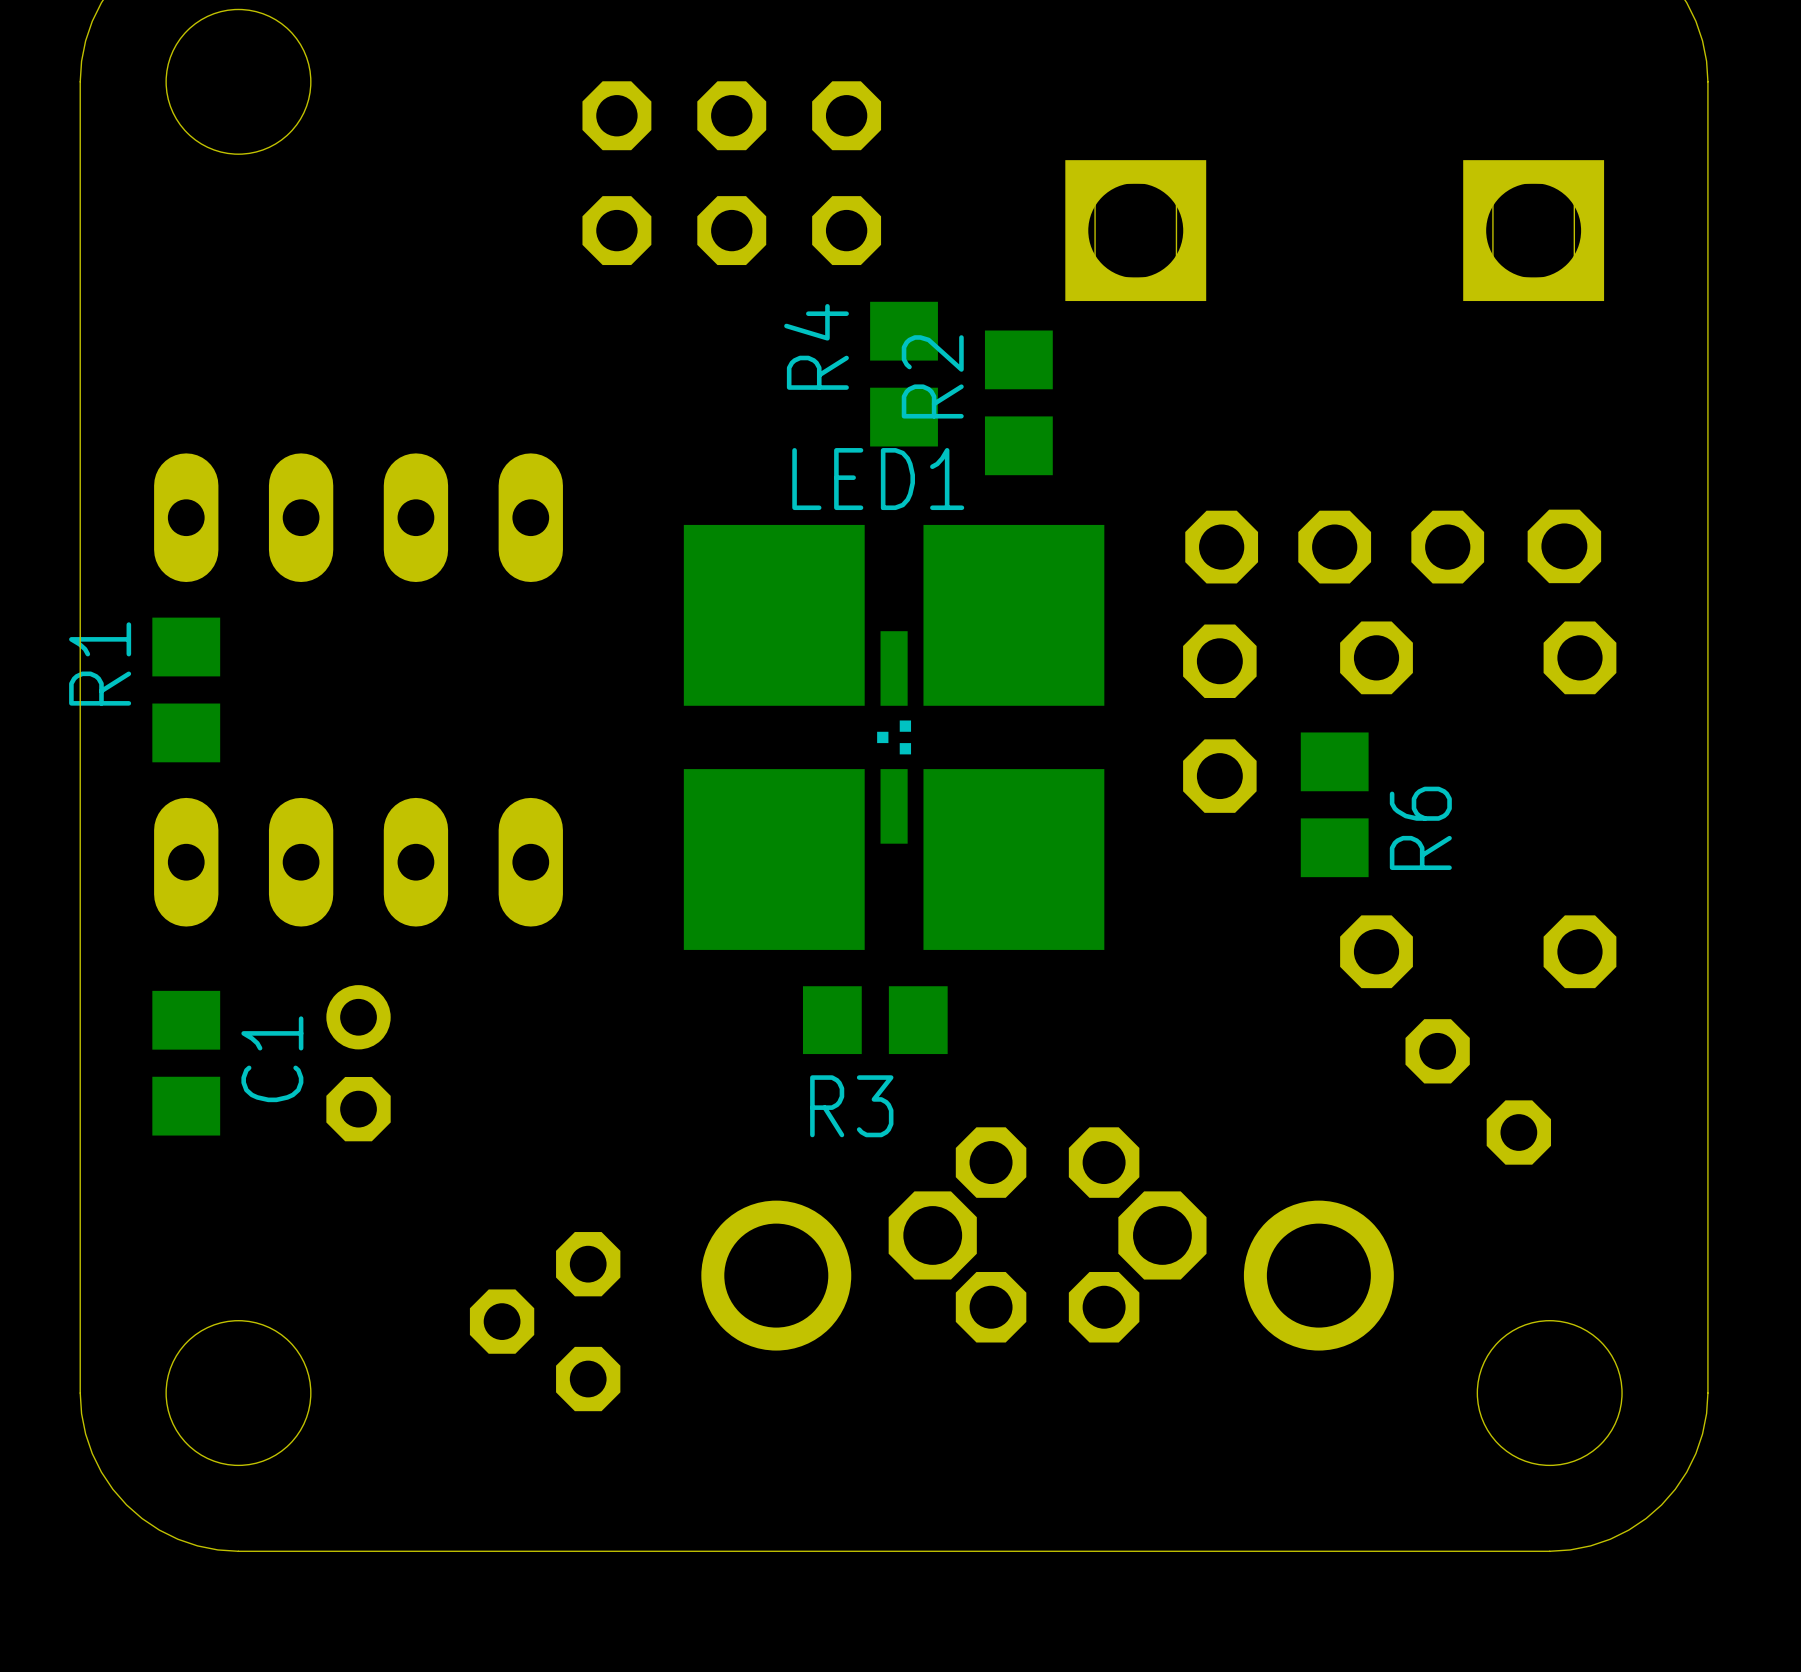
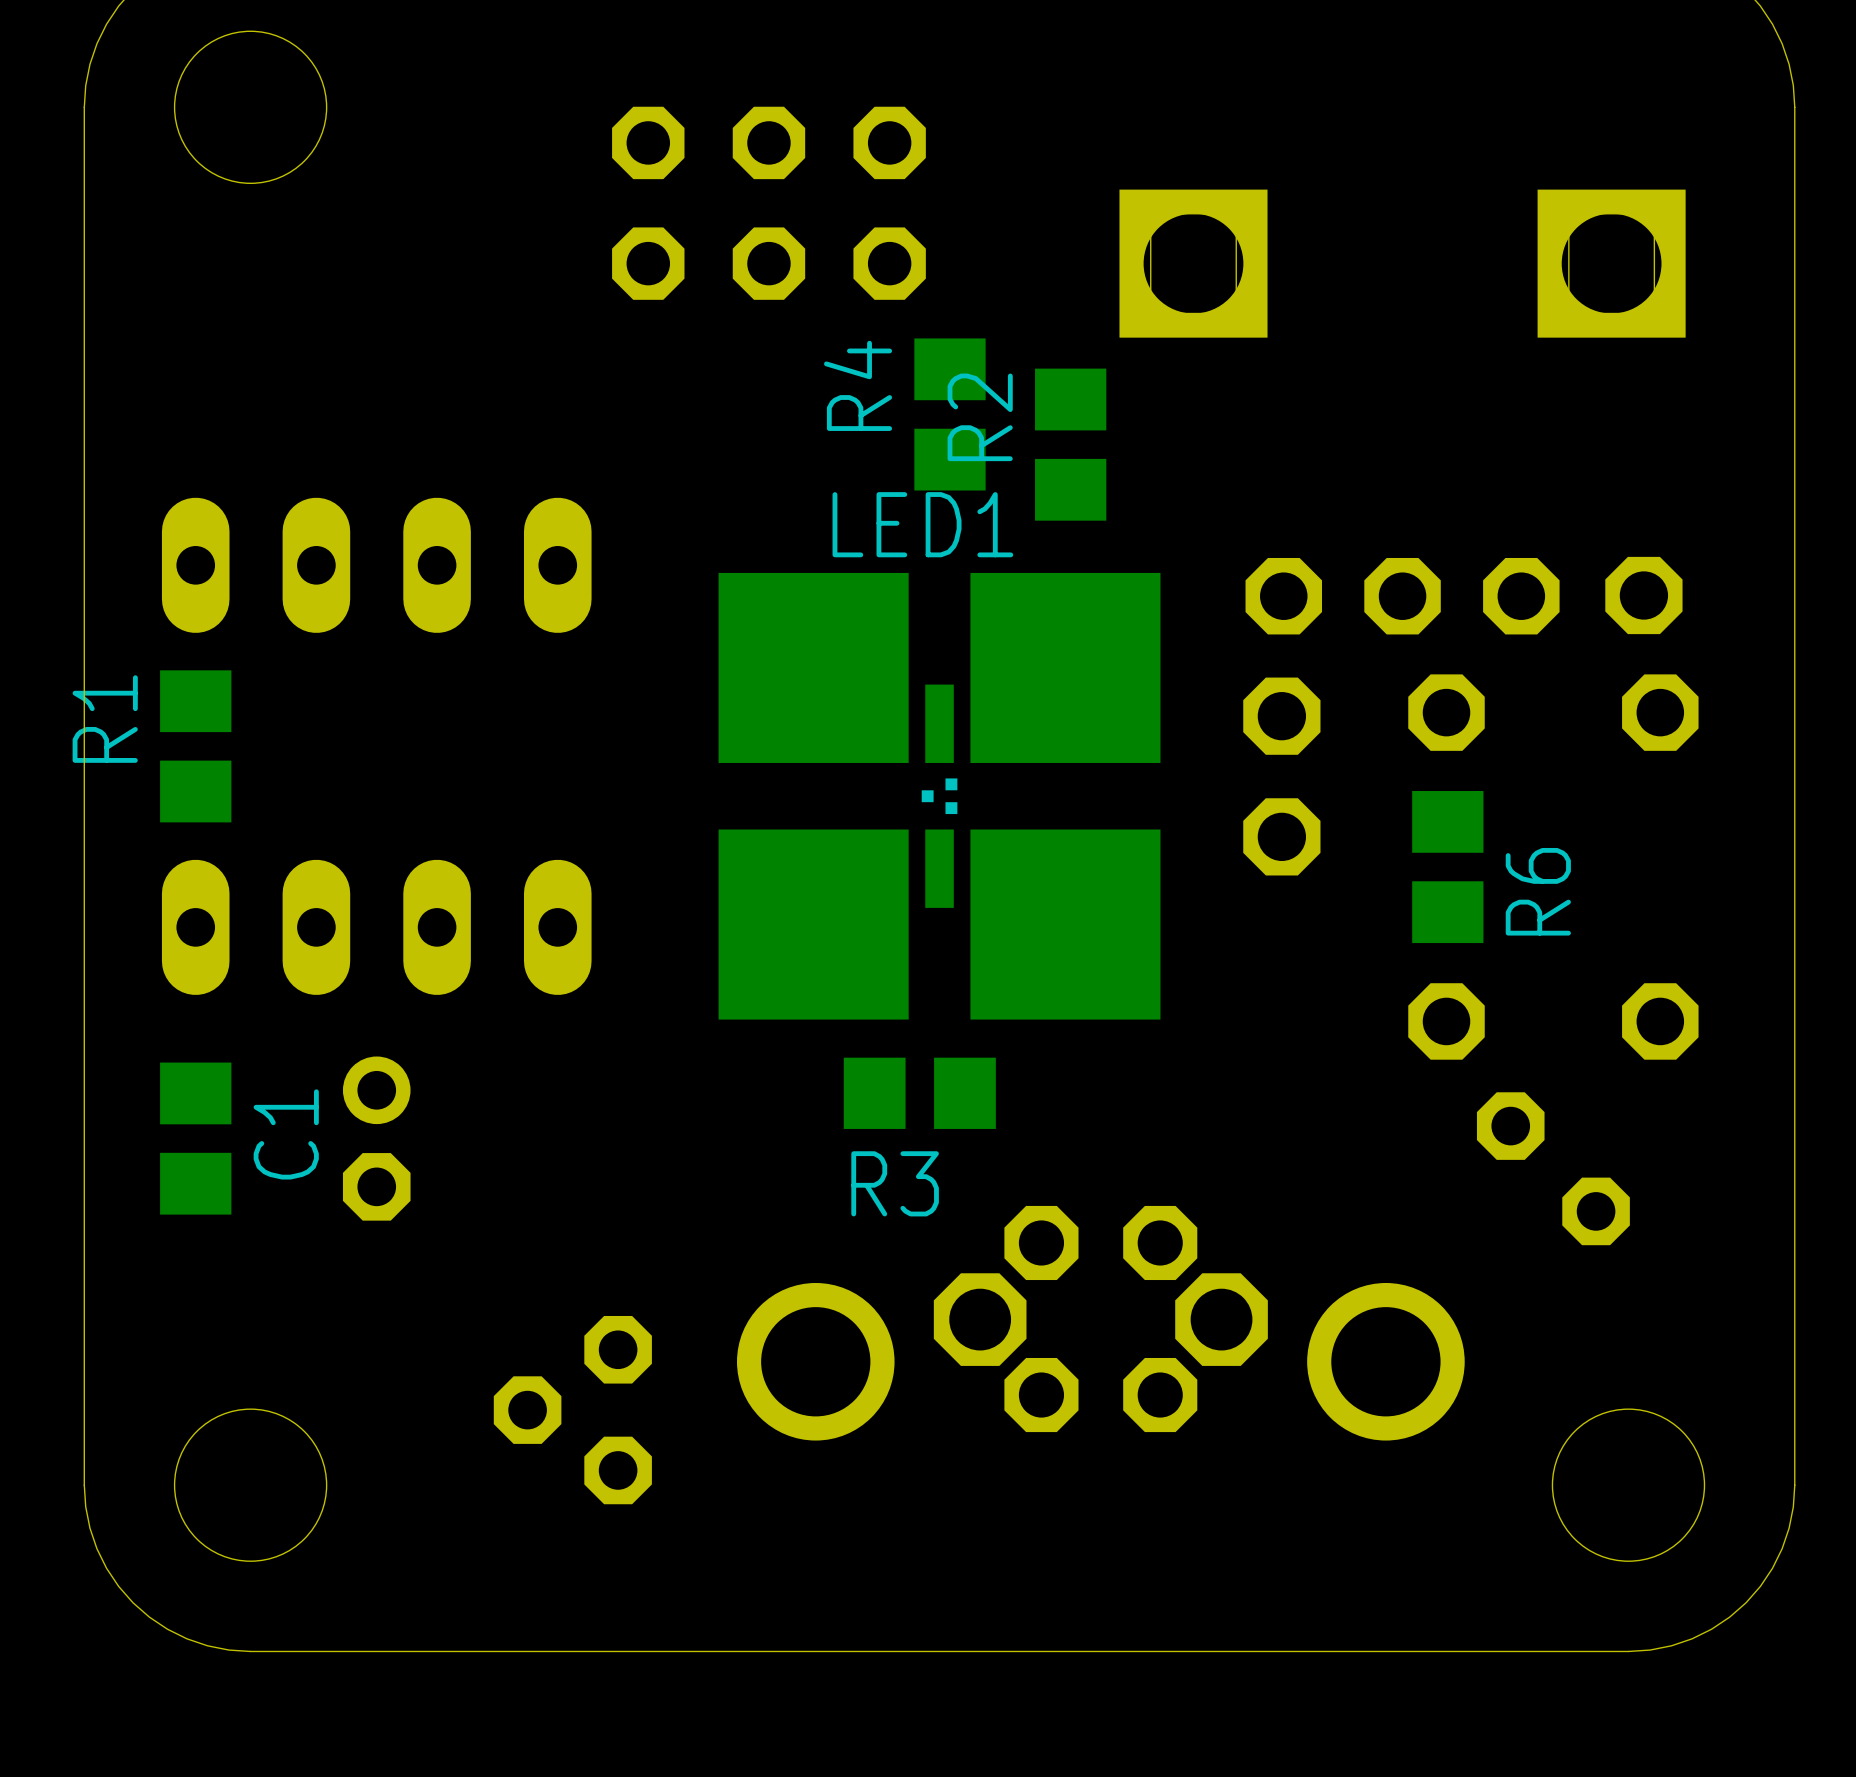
R6 position: (1334, 804) -> (1447, 867)

